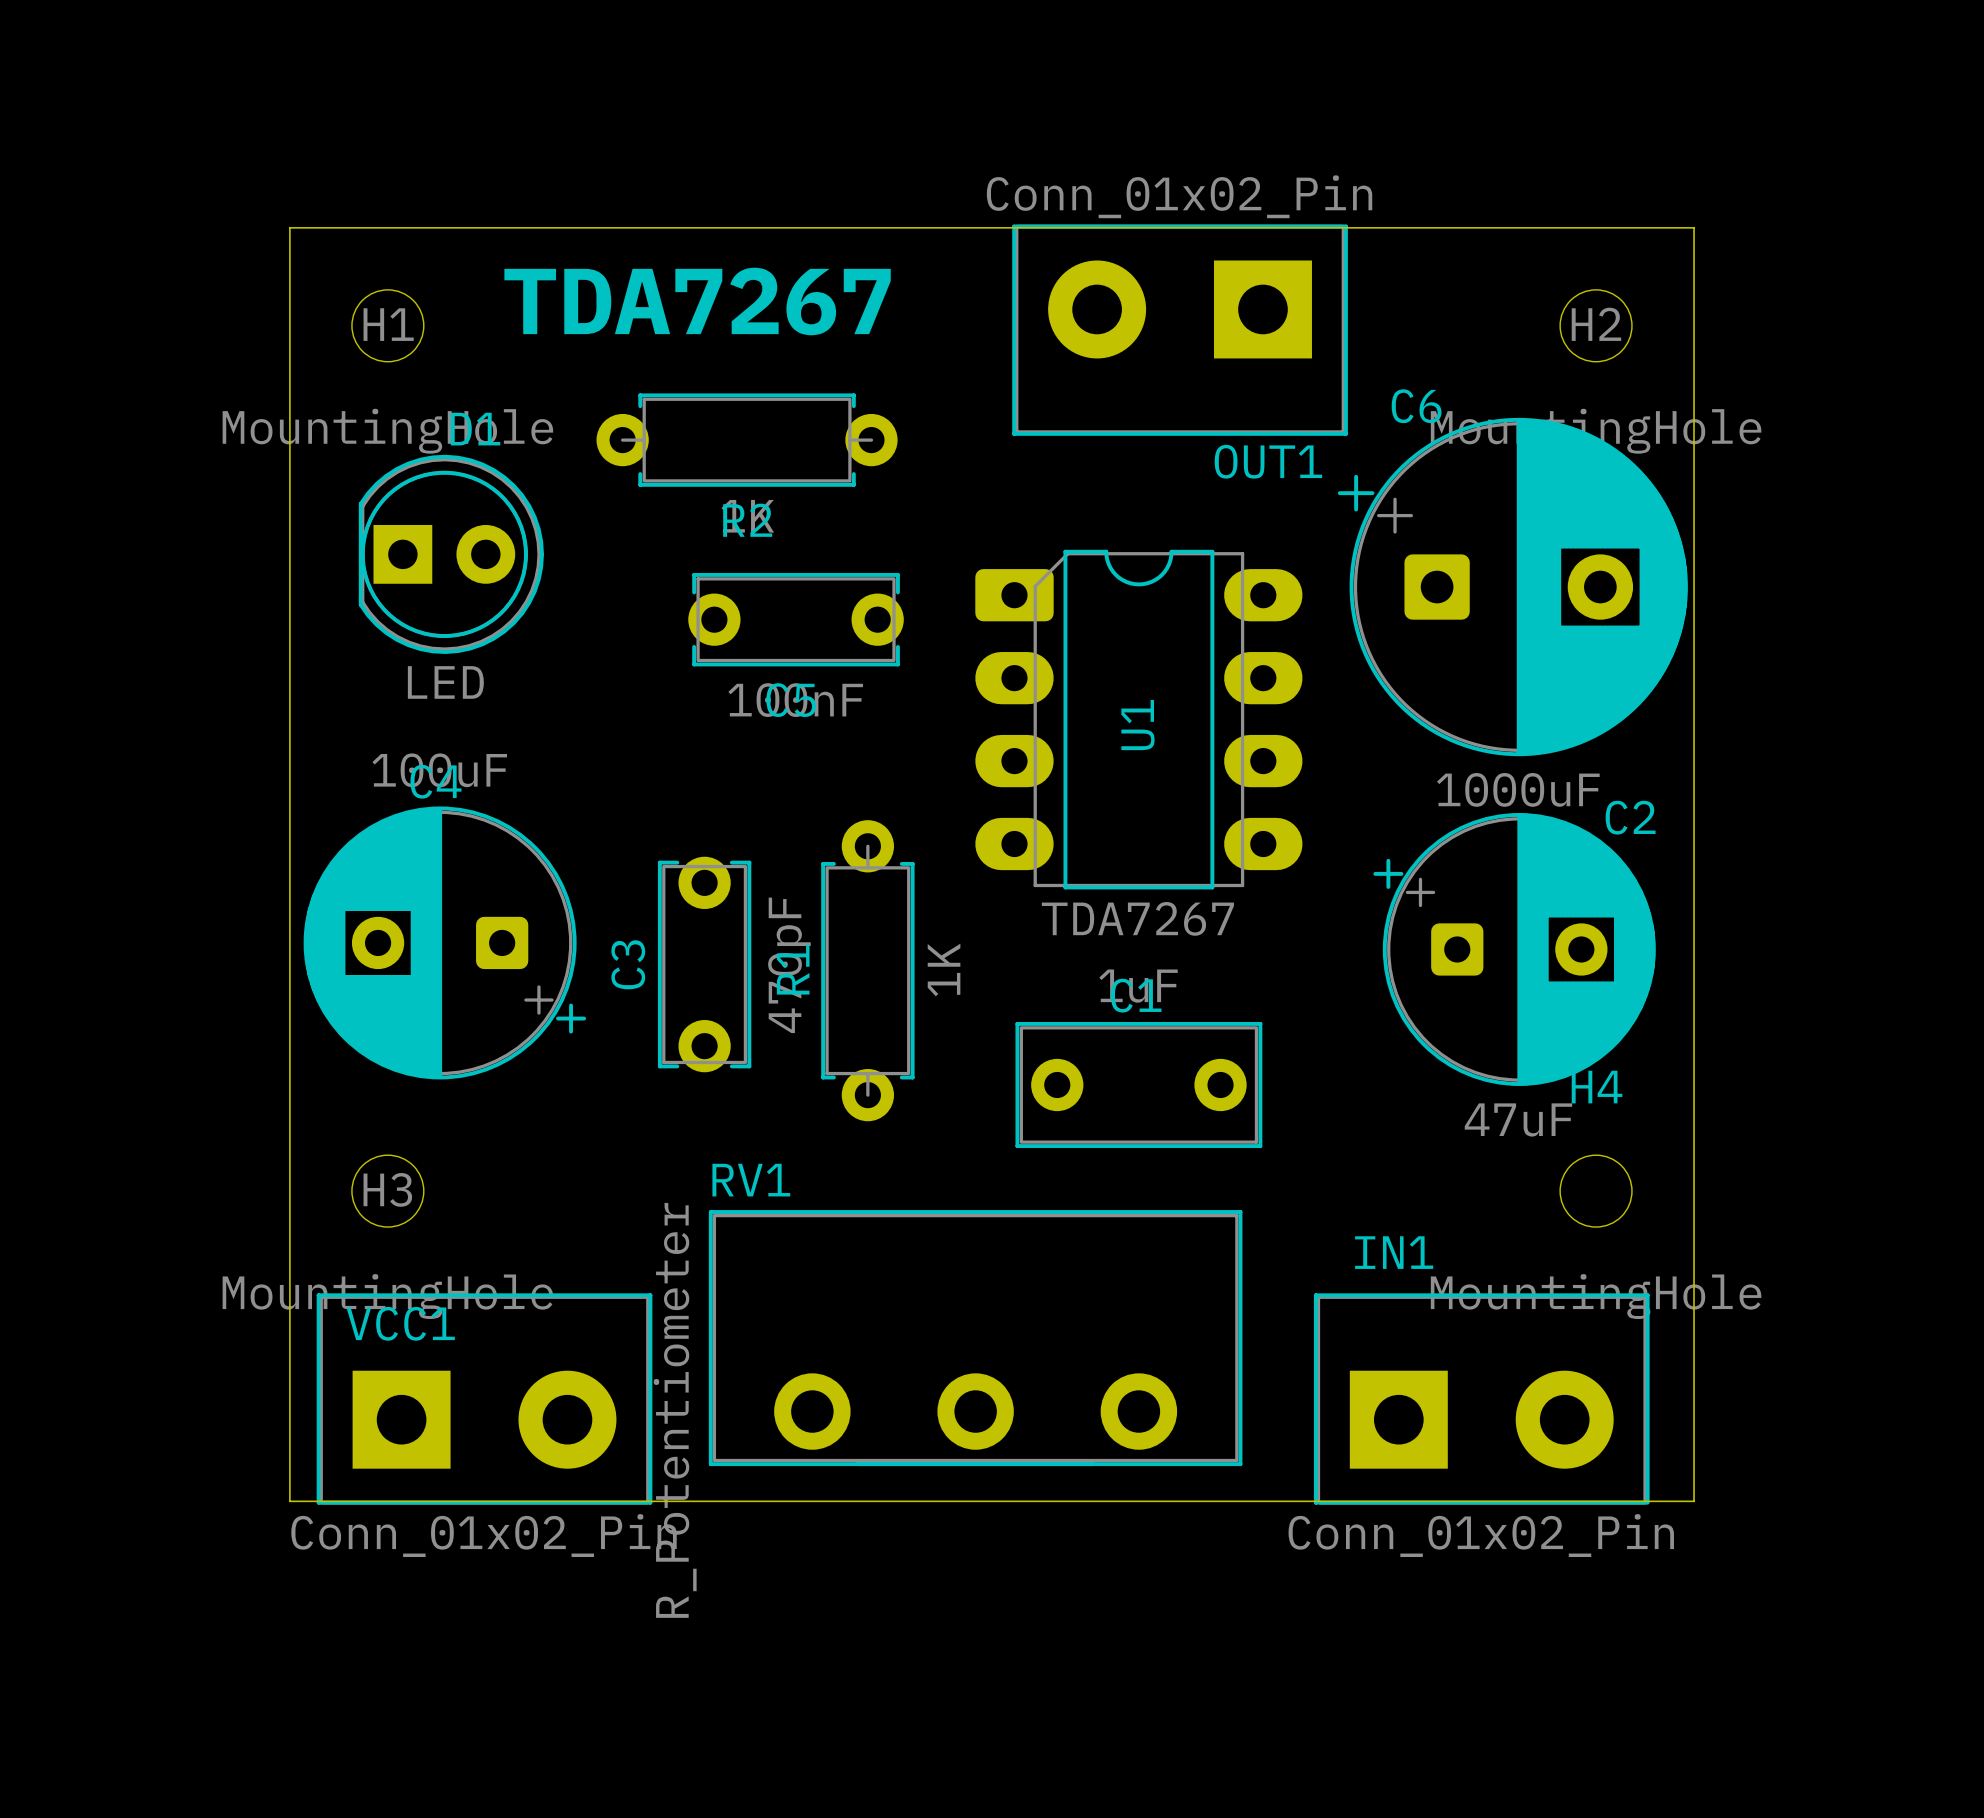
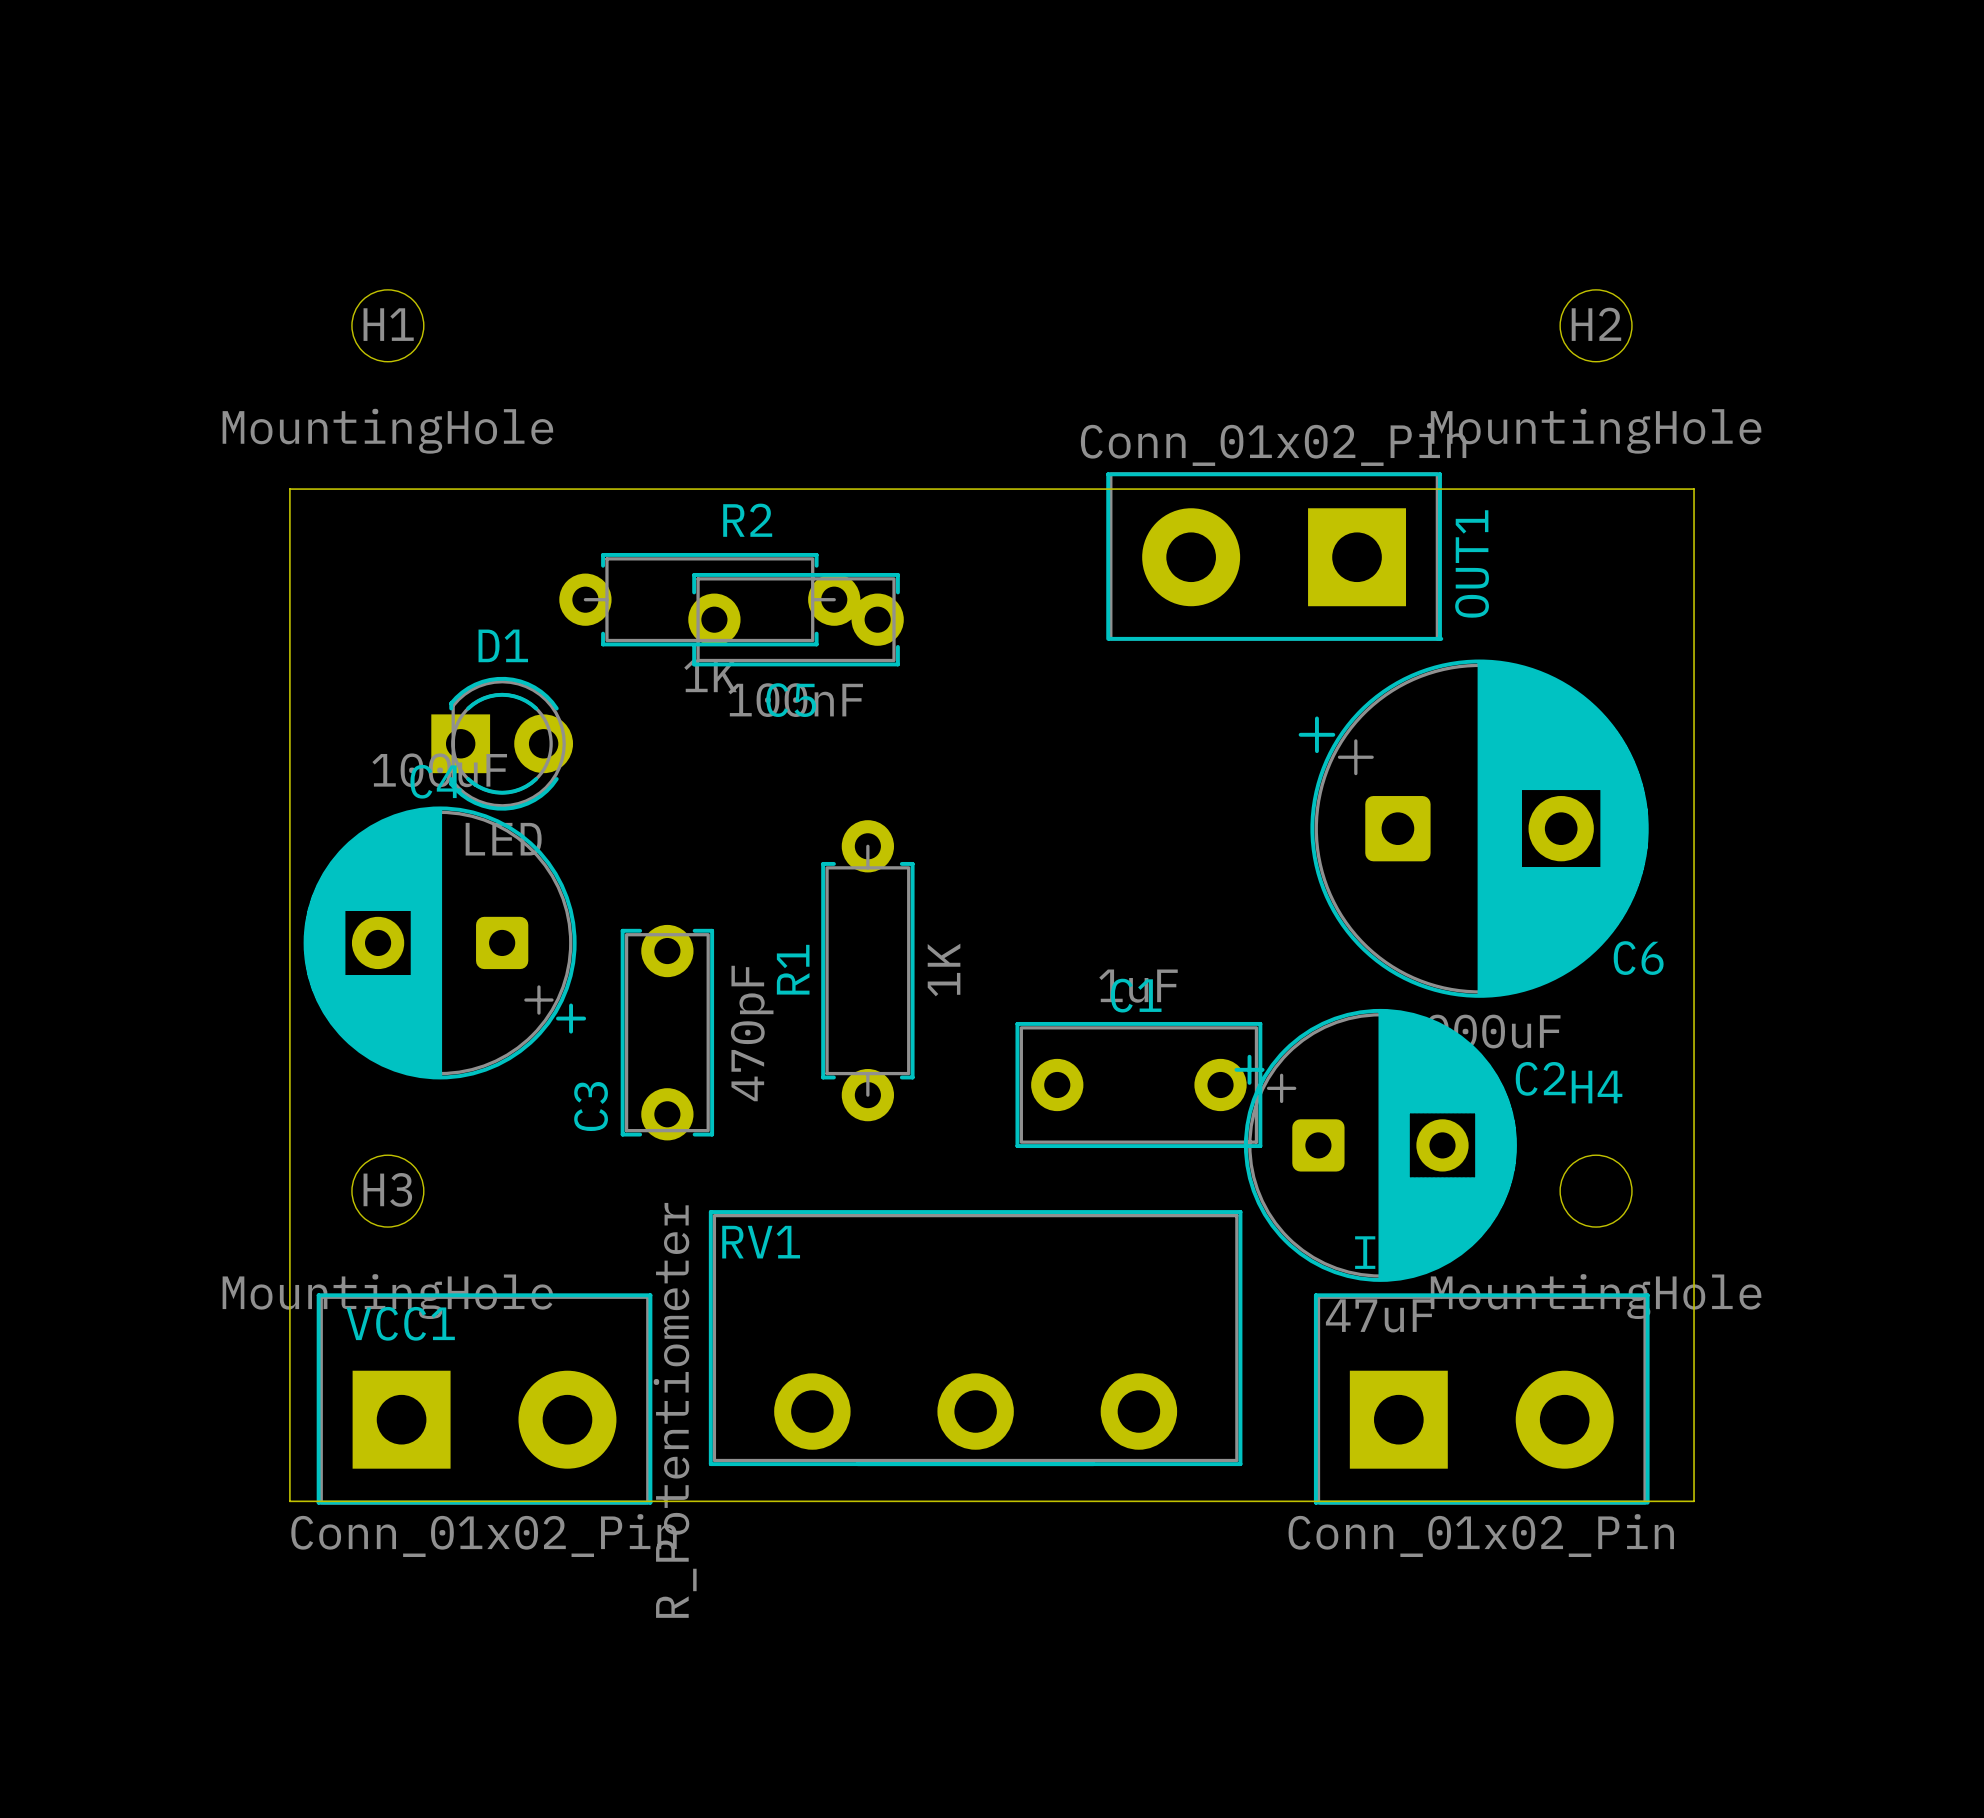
OUT1 footprint: [1012, 224, 1348, 436] -> [1106, 472, 1444, 641]
text: TDA7267 (697, 301) -> none
C6 name position: C6 (1416, 406) -> C6 (1638, 958)
R2 position: (747, 440) -> (709, 599)
D1 footprint: [358, 454, 544, 654] -> [431, 676, 574, 811]
OUT1 name position: OUT1 (1268, 461) -> OUT1 (1472, 563)
board edge: (289, 489) (289, 227) (1694, 227) (1694, 489) -> (289, 489) (1694, 489)
C6 position: (1512, 587) -> (1473, 828)
U1: TDA7267 (1138, 719) -> none
C2 name position: C2 (1630, 817) -> C2 (1540, 1078)
C2 position: (1514, 949) -> (1375, 1145)
C3 name position: C3 (628, 964) -> C3 (591, 1106)
C3 position: (704, 964) -> (667, 1032)
RV1 name position: RV1 (751, 1180) -> RV1 (761, 1242)

